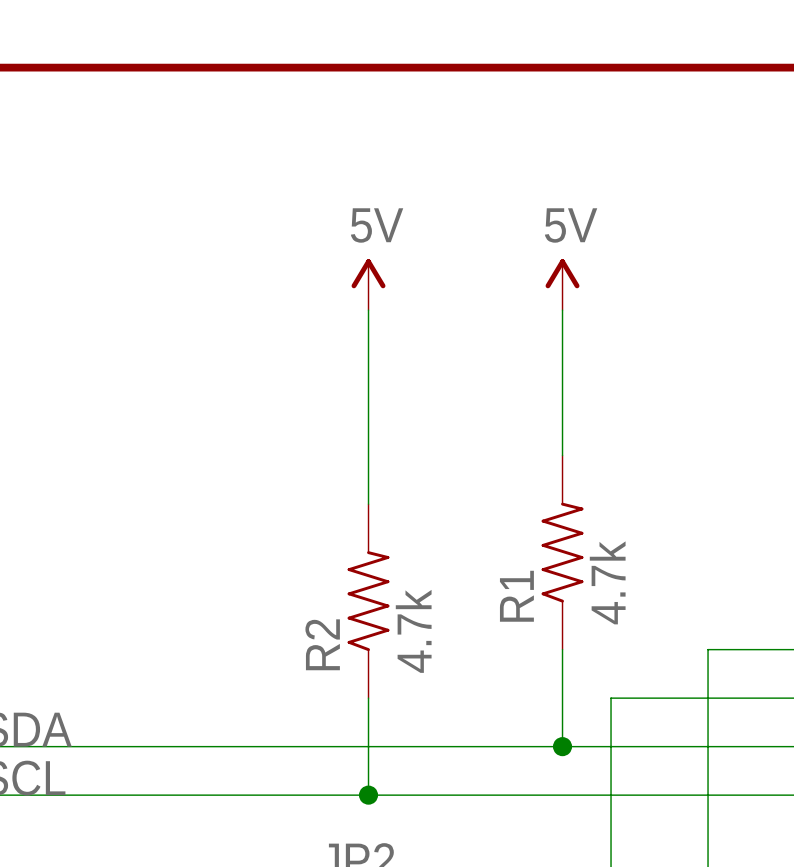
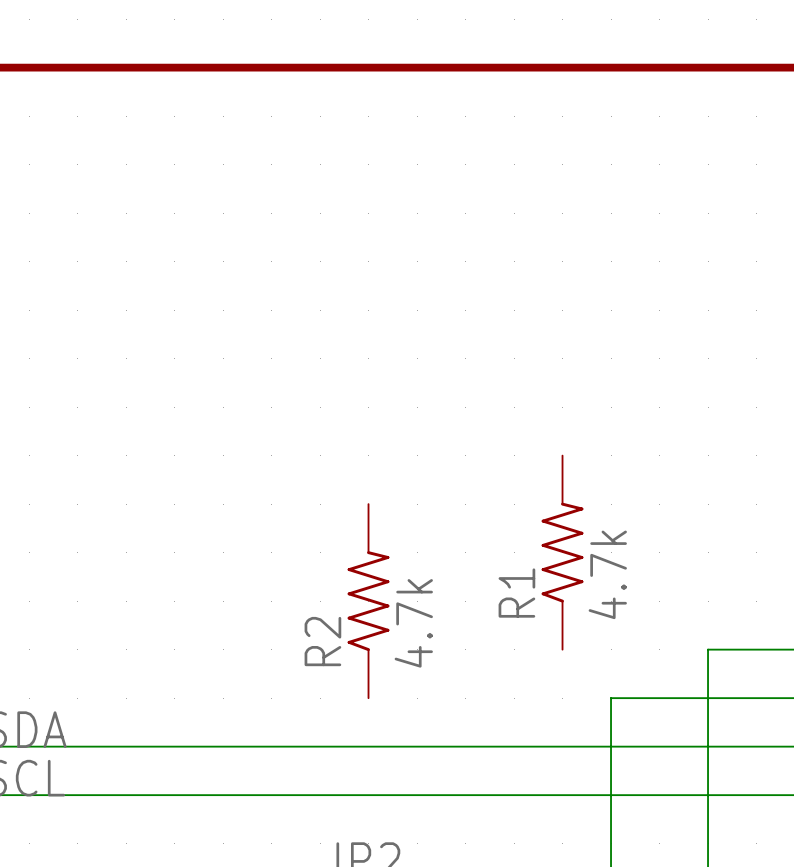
power symbol: 5V (368, 284) -> none
power symbol: 5V (562, 284) -> none
wire: (368, 310) (368, 504) -> none
wire: (562, 310) (562, 455) -> none
wire: (562, 649) (562, 746) -> none
wire: (368, 698) (368, 795) -> none
junction: (562, 746) -> none
junction: (368, 795) -> none

